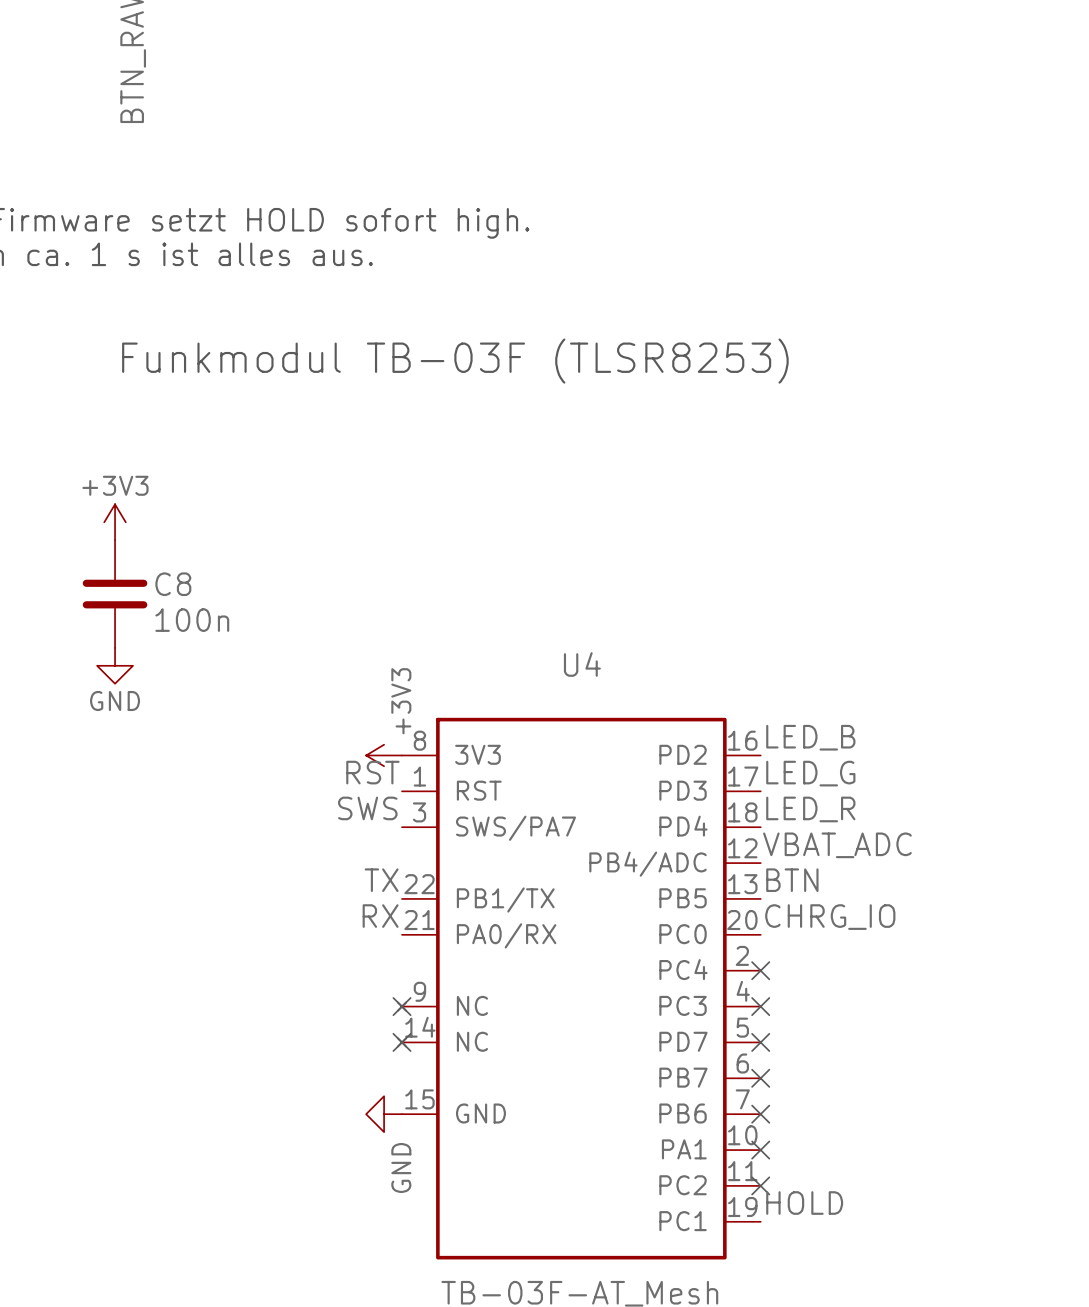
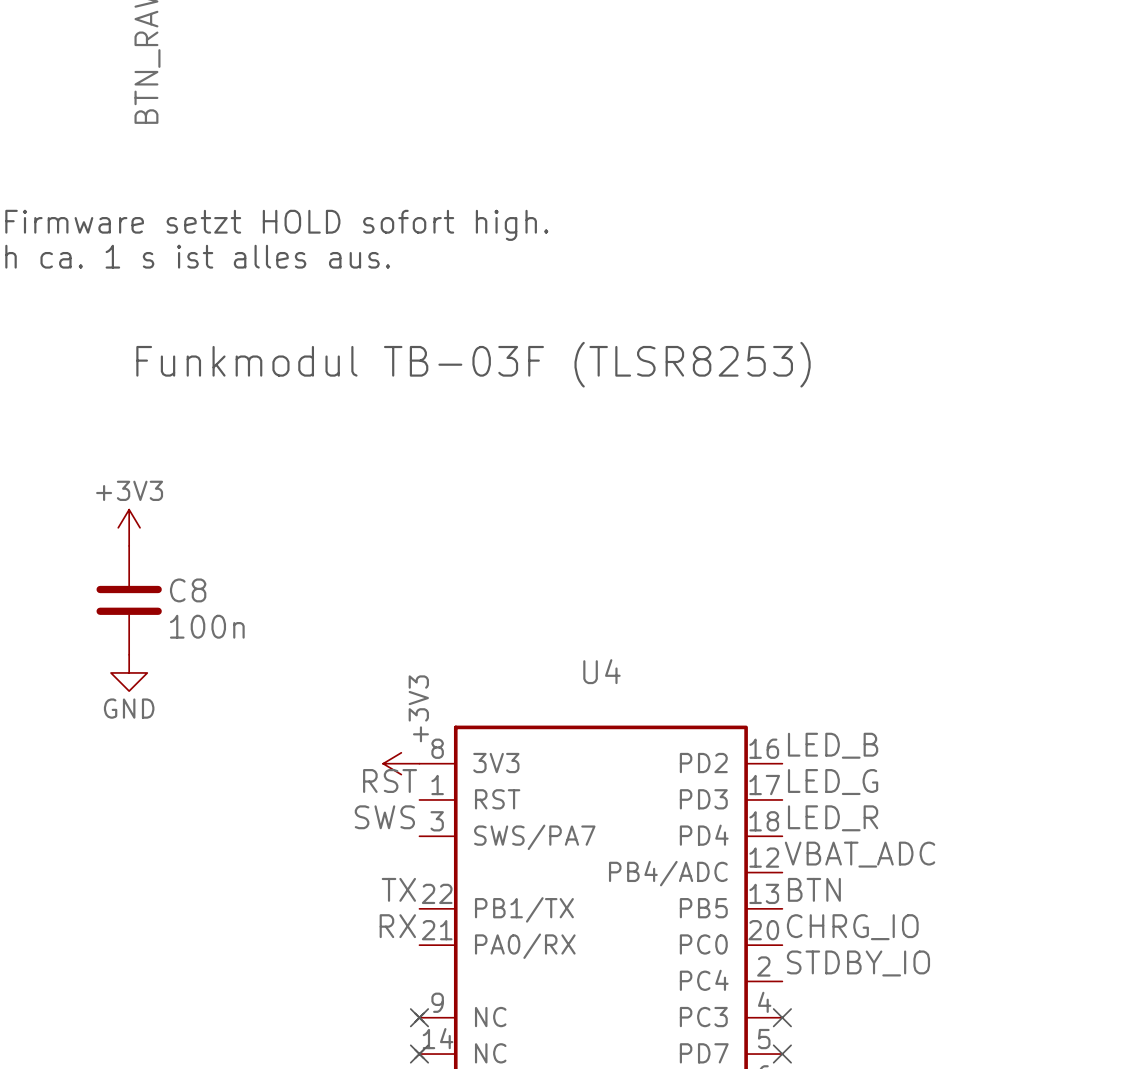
label: none -> STDBY_IO (858, 963)
no-connect mark: (760, 970) -> none

